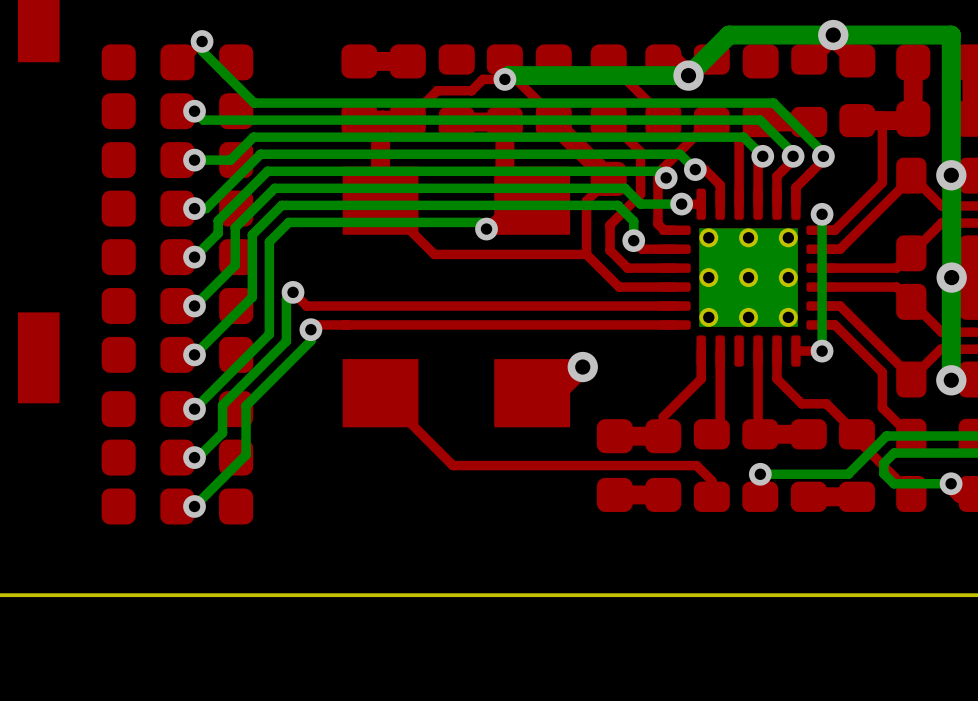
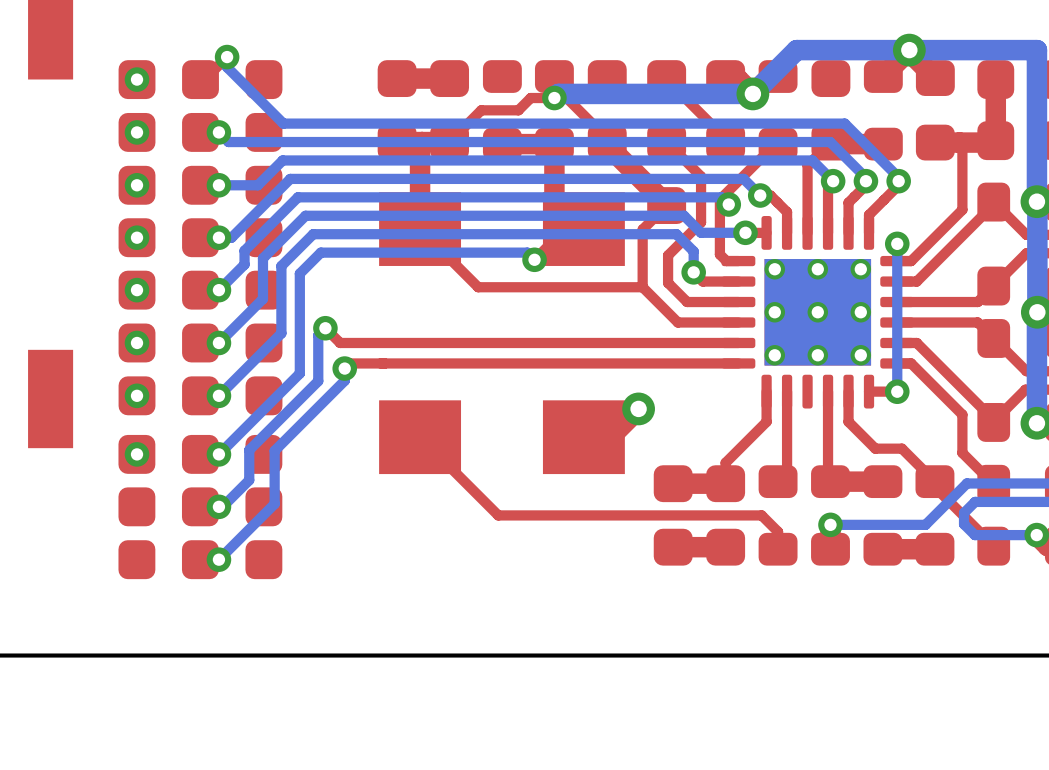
via: none -> (137, 79)
via: none -> (137, 132)
via: none -> (137, 185)
via: none -> (137, 237)
via: none -> (137, 290)
via: none -> (137, 342)
via: none -> (137, 395)
via: none -> (137, 454)

